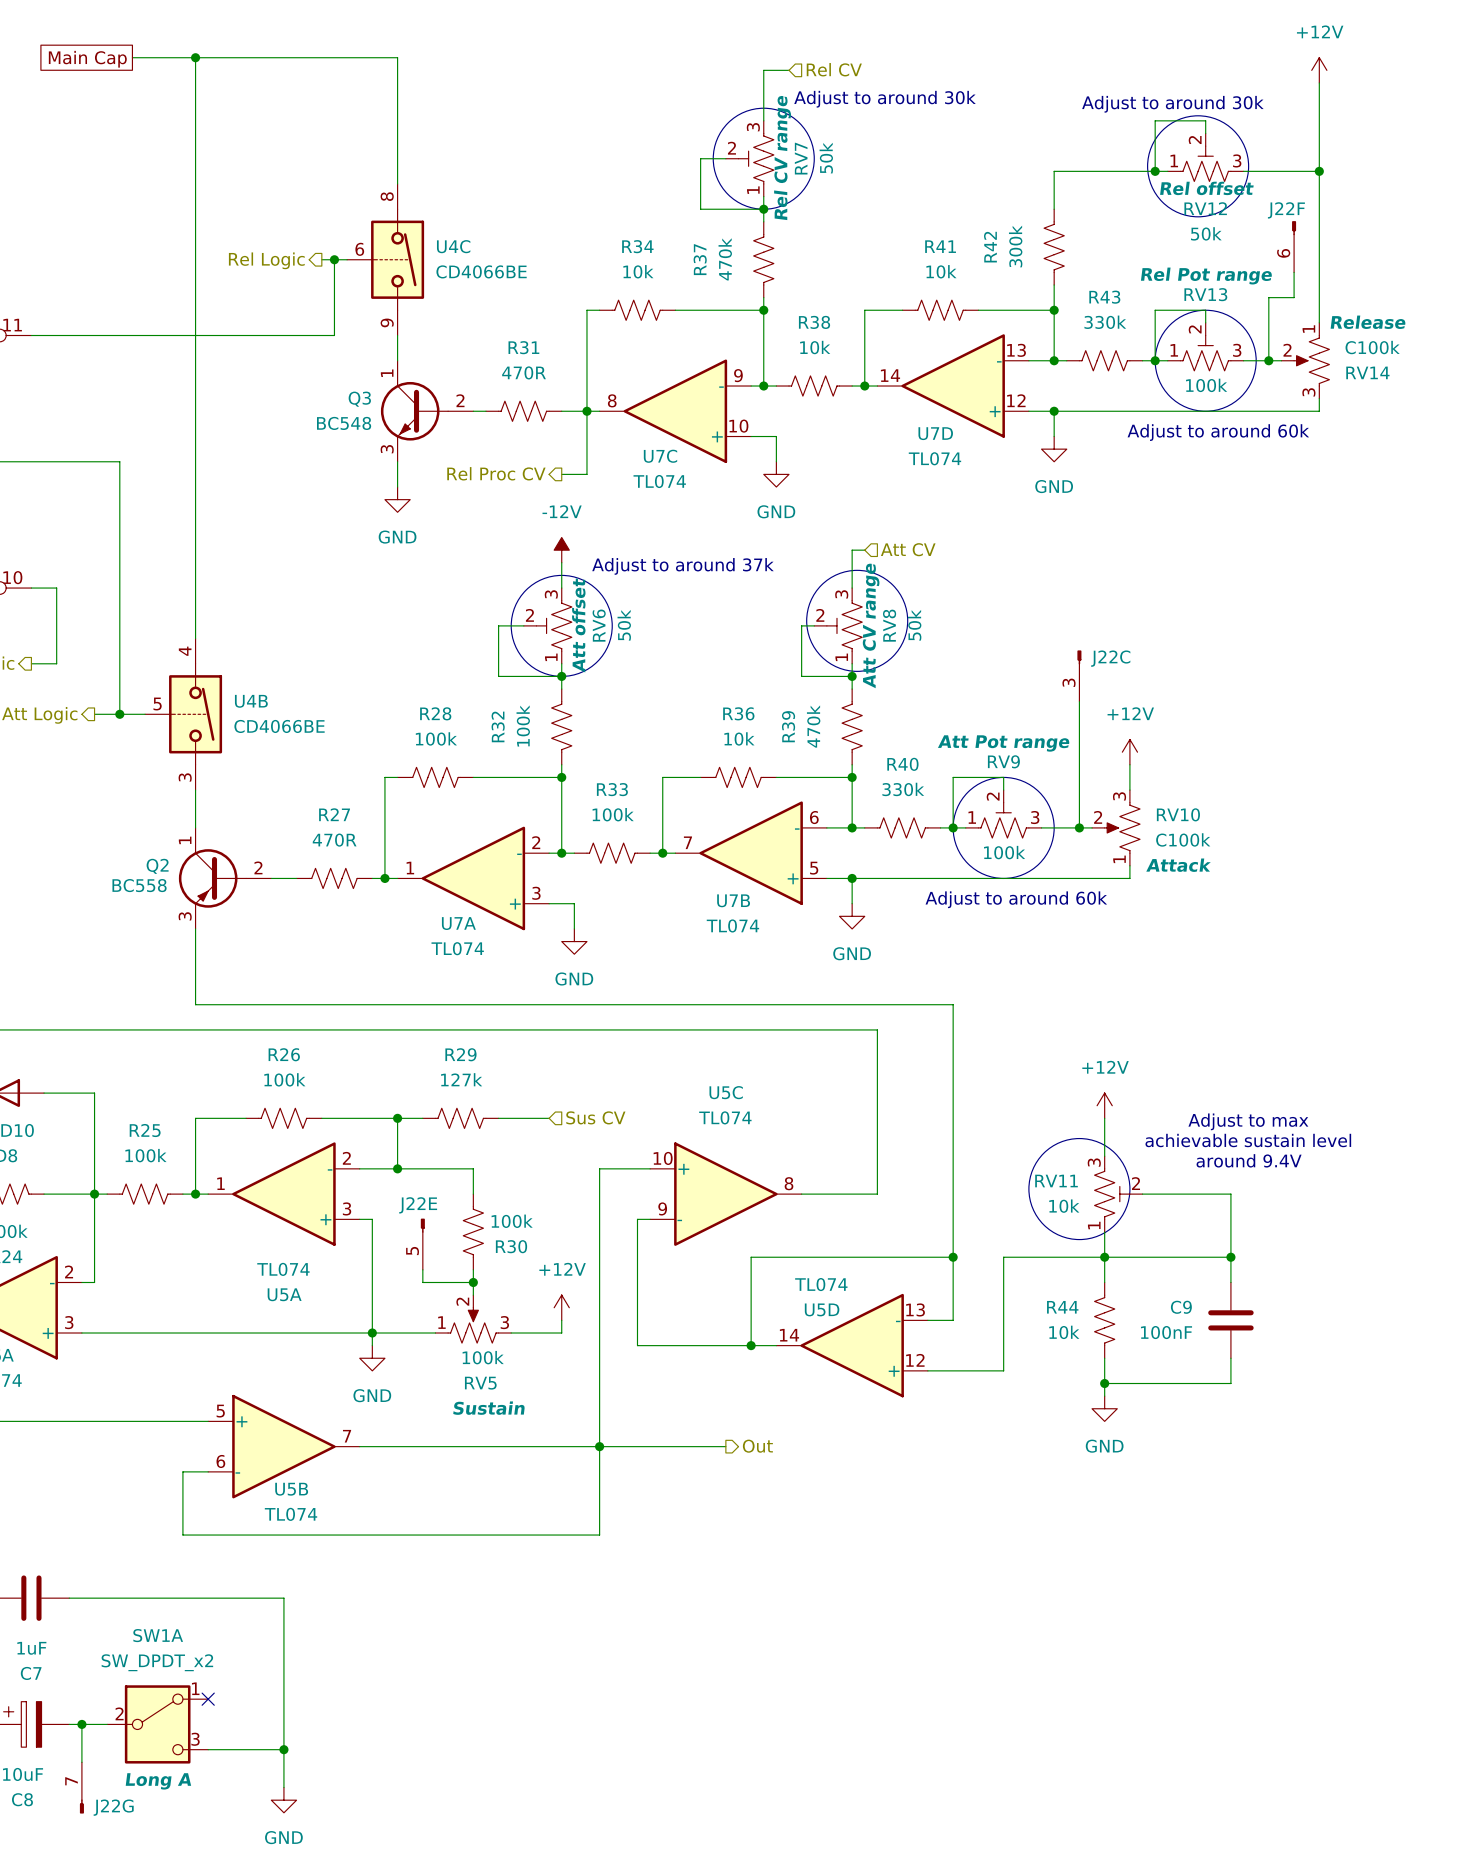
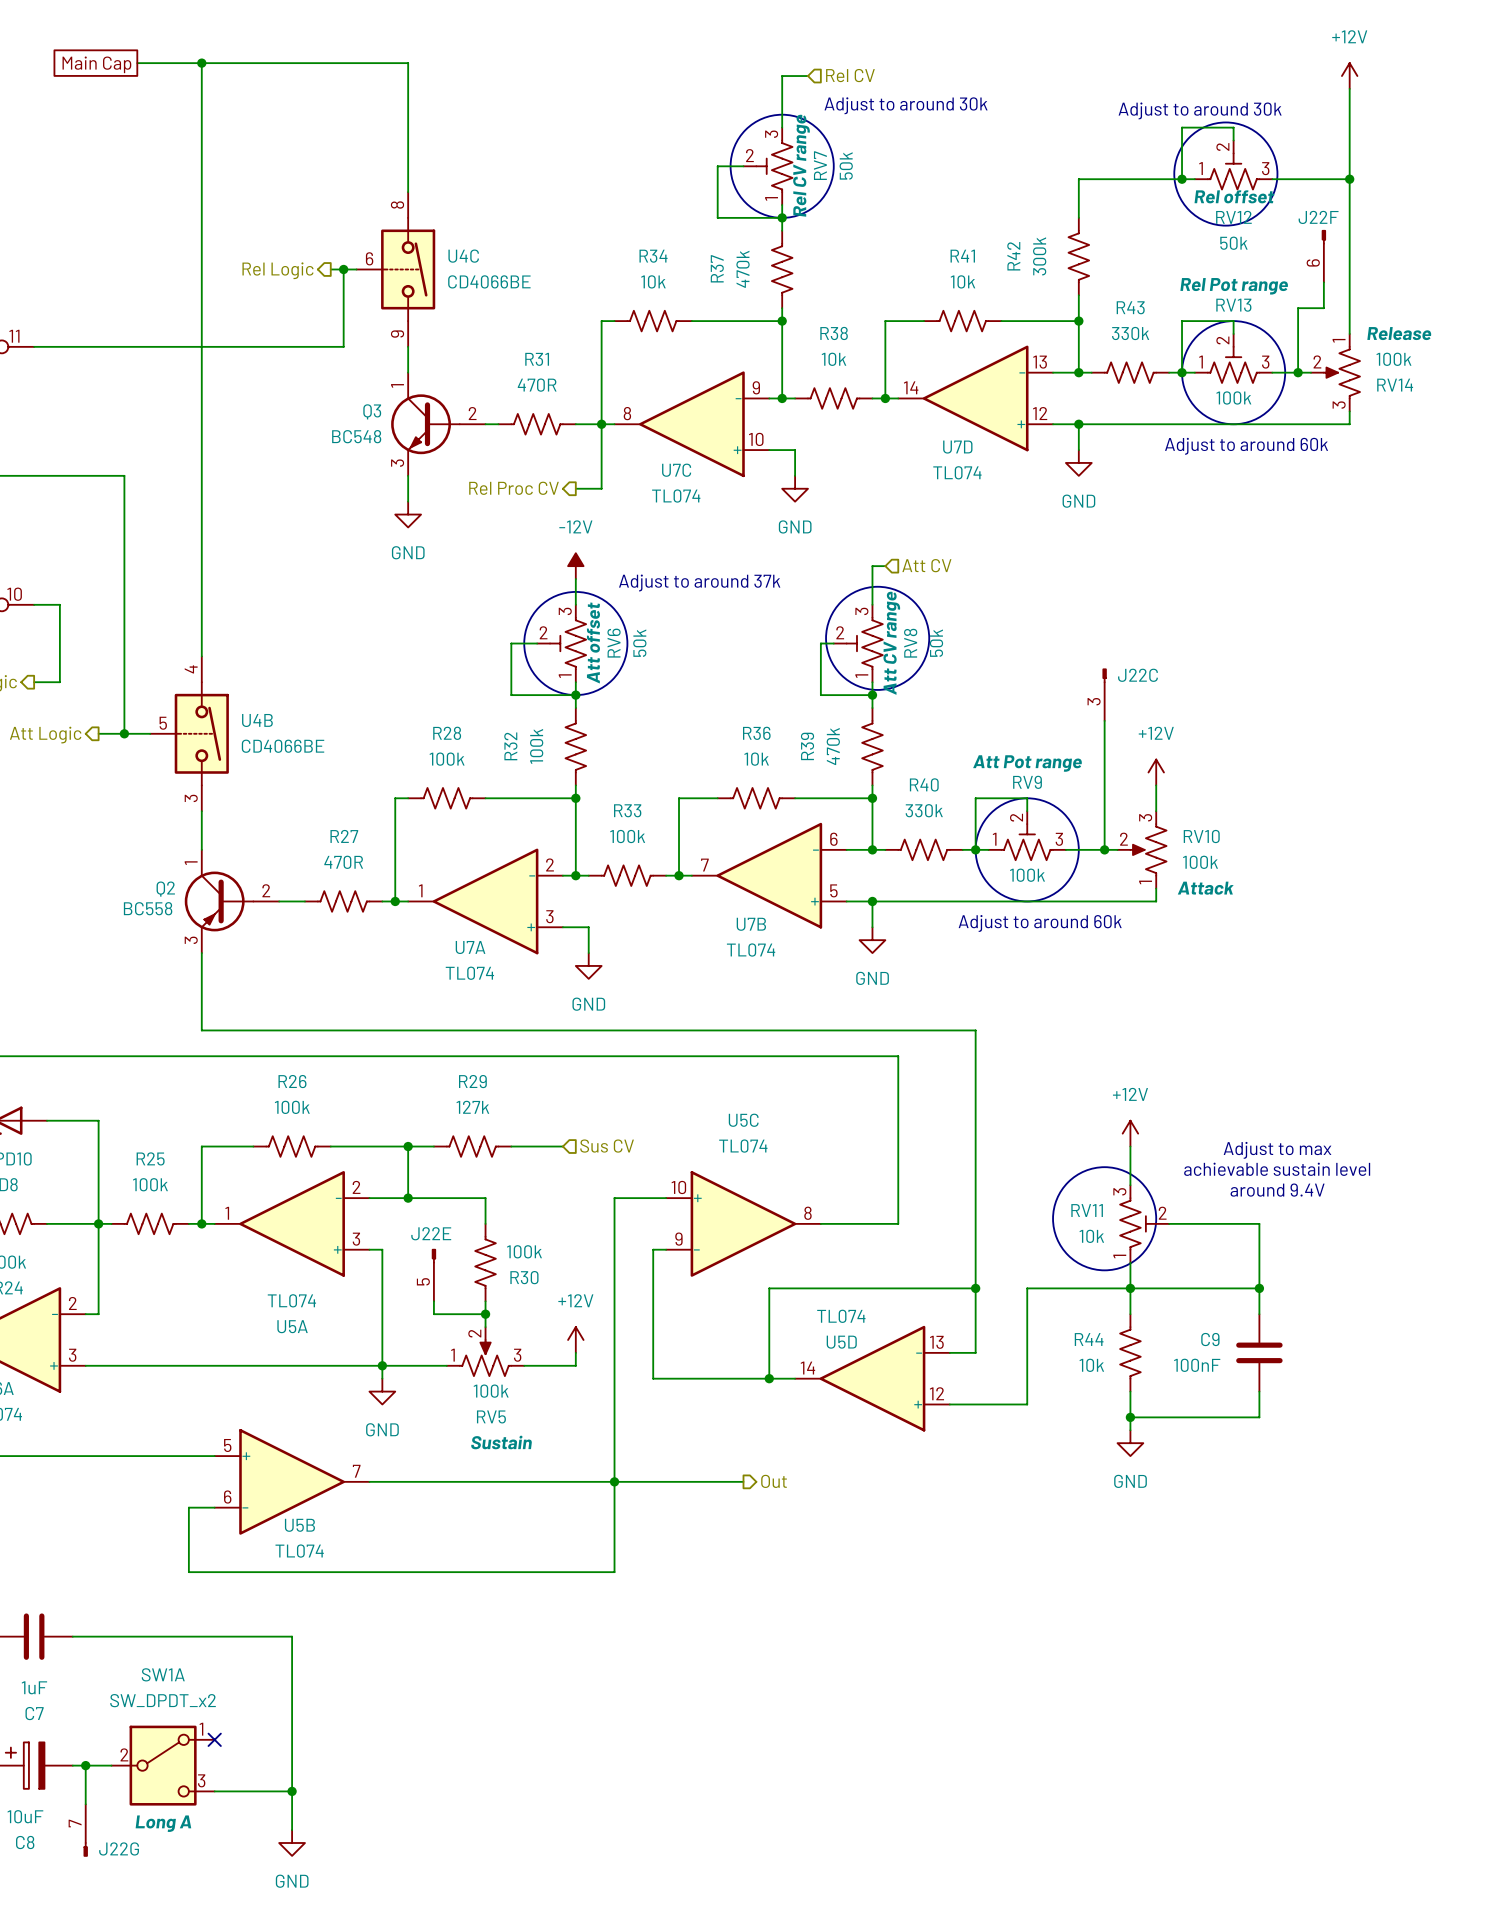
RV14 value: C100k (1372, 347) -> 100k (1393, 359)
RV10 value: C100k (1183, 839) -> 100k (1200, 862)

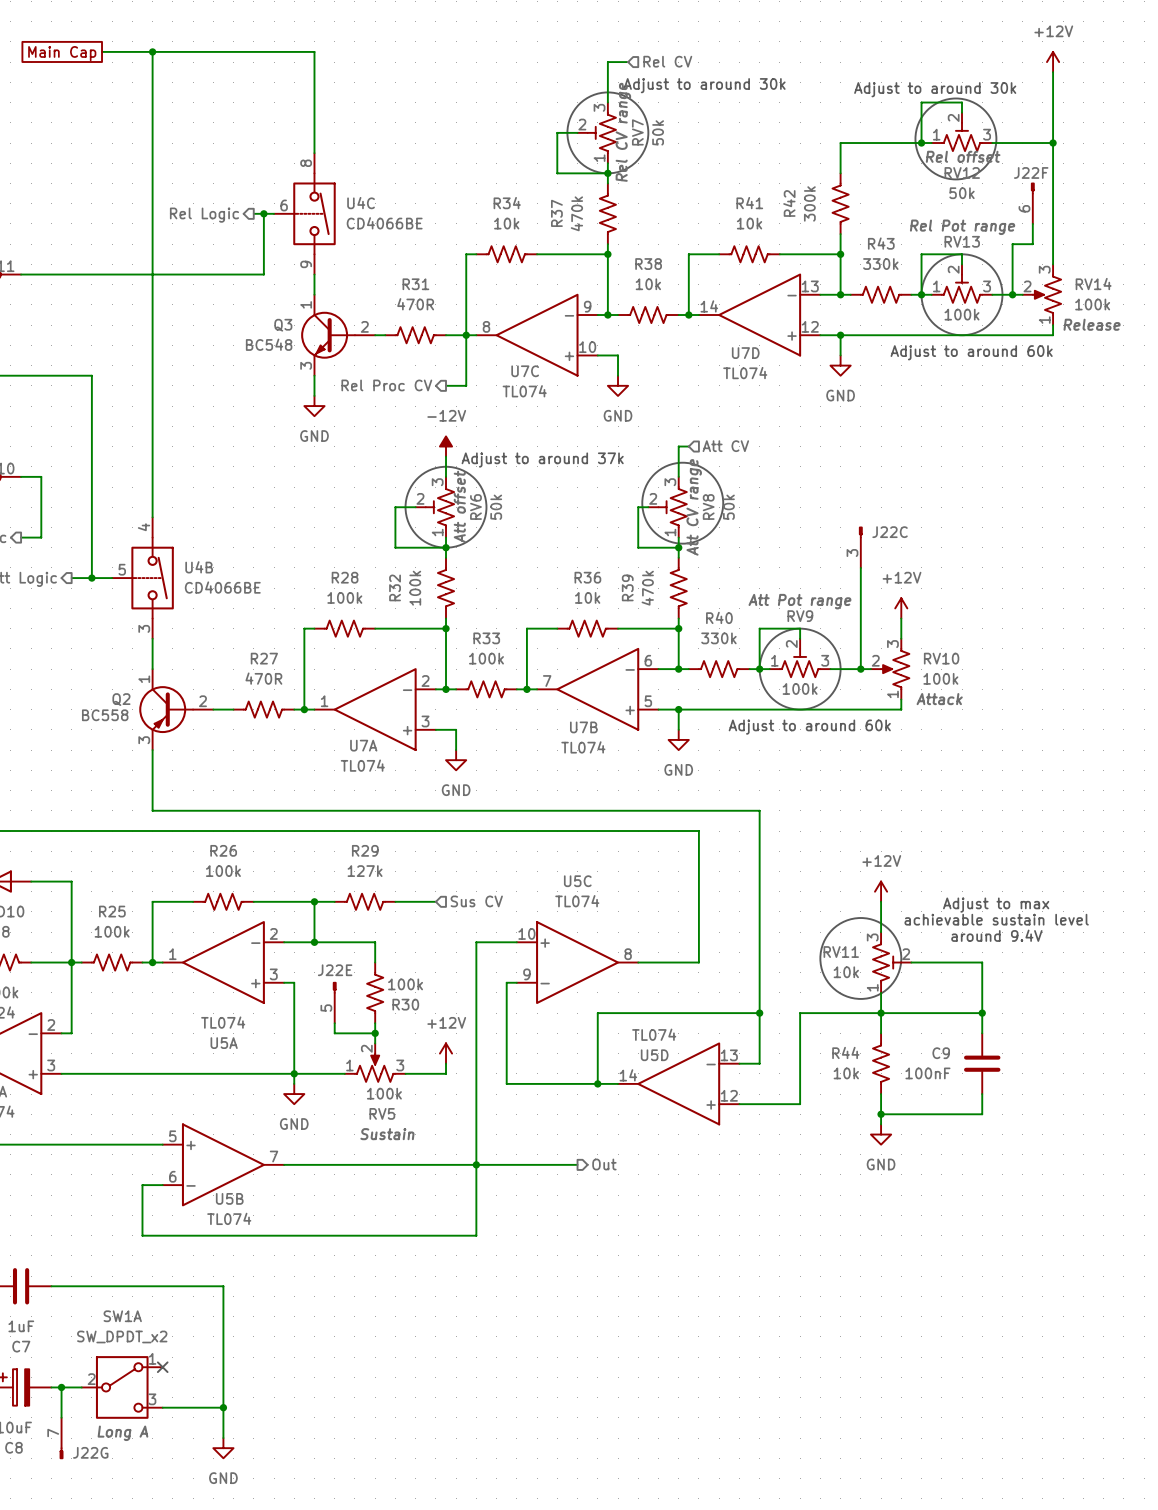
RV14 flip: as is (1341, 372) -> up-down (1046, 294)

